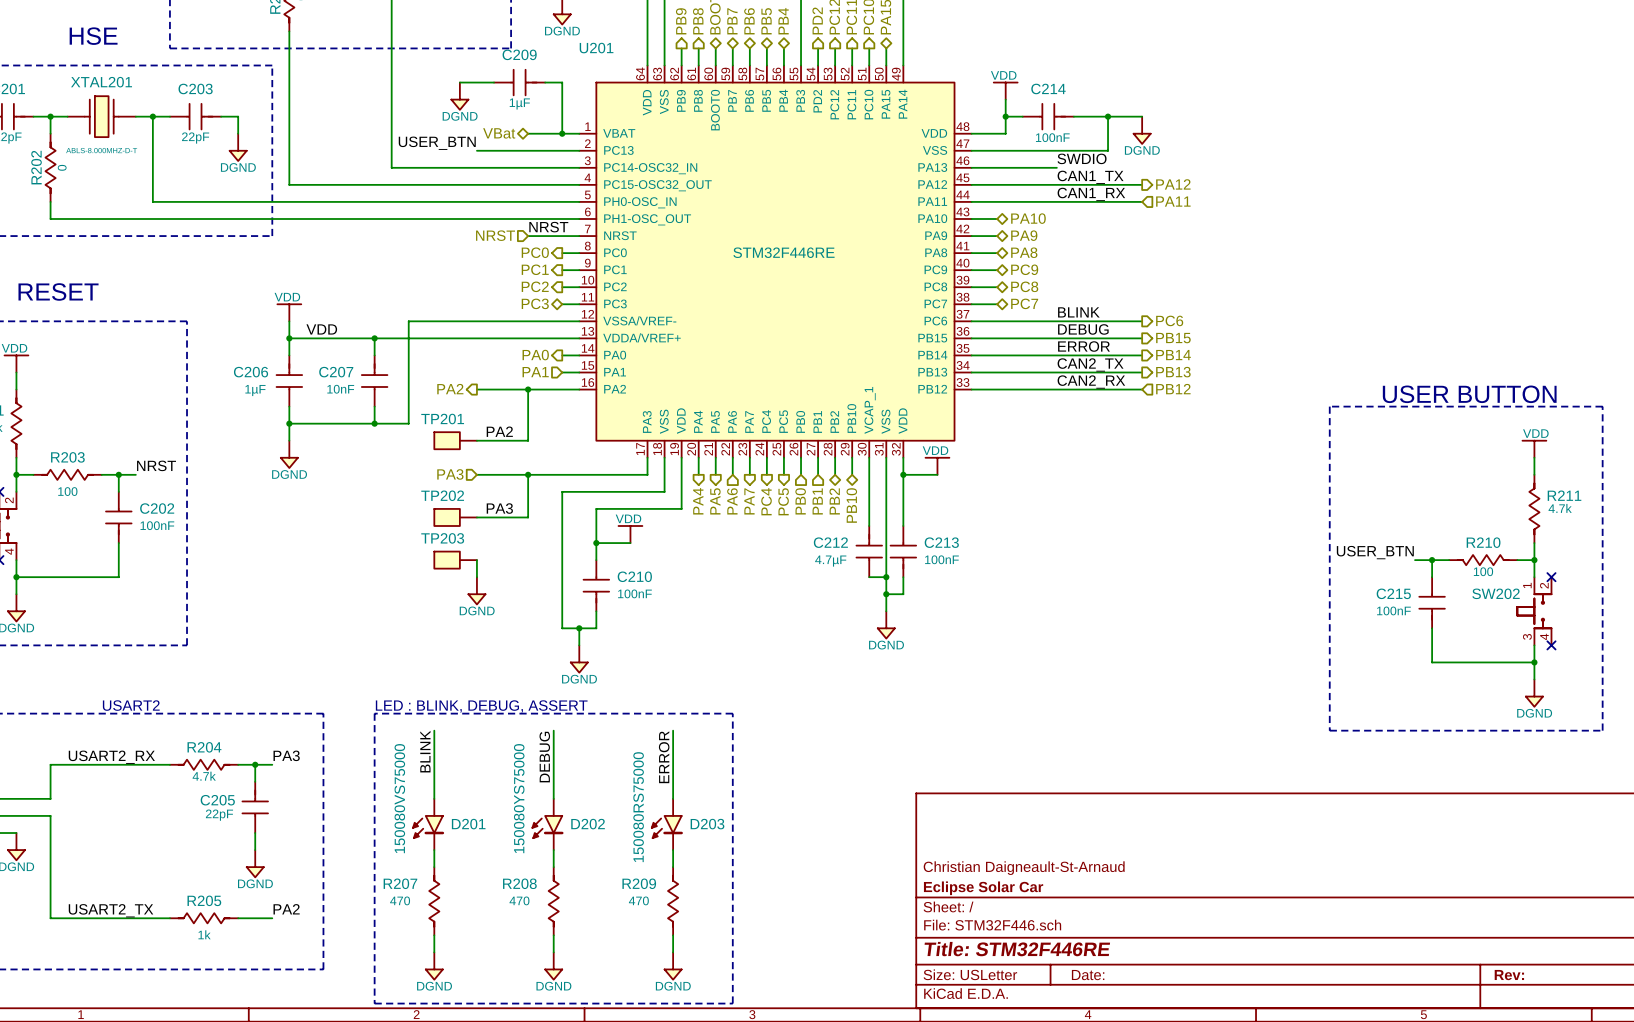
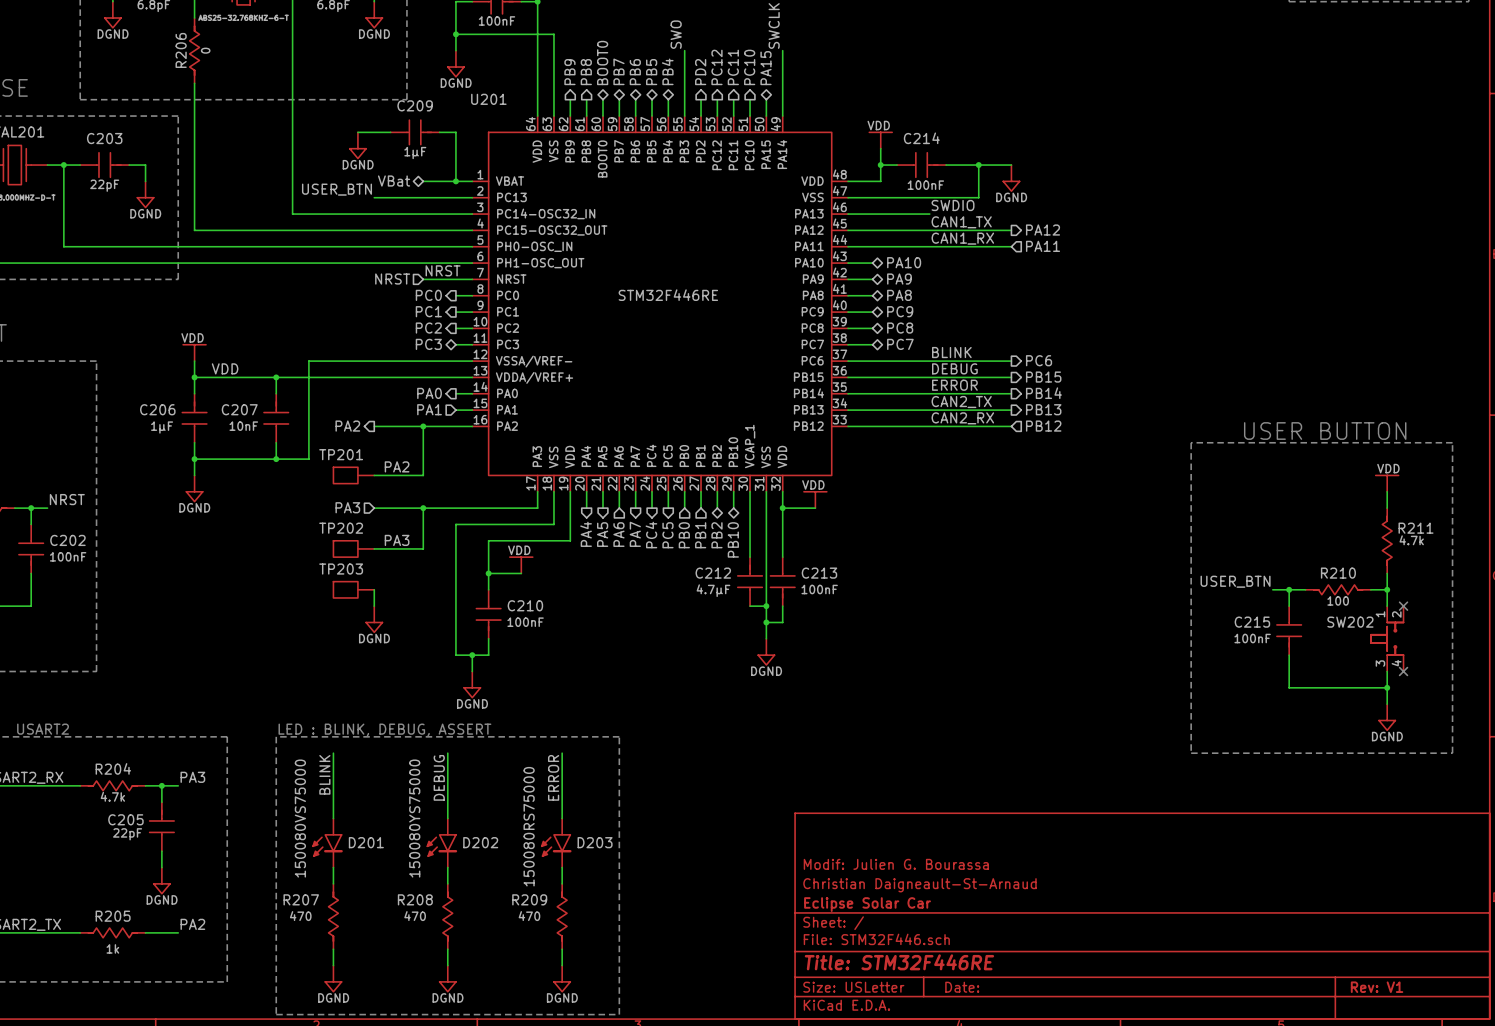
title block: none -> Modif: Julien G. Bourassa (896, 864)
title block: Rev: (1509, 975) -> Rev: V1 (1377, 987)

